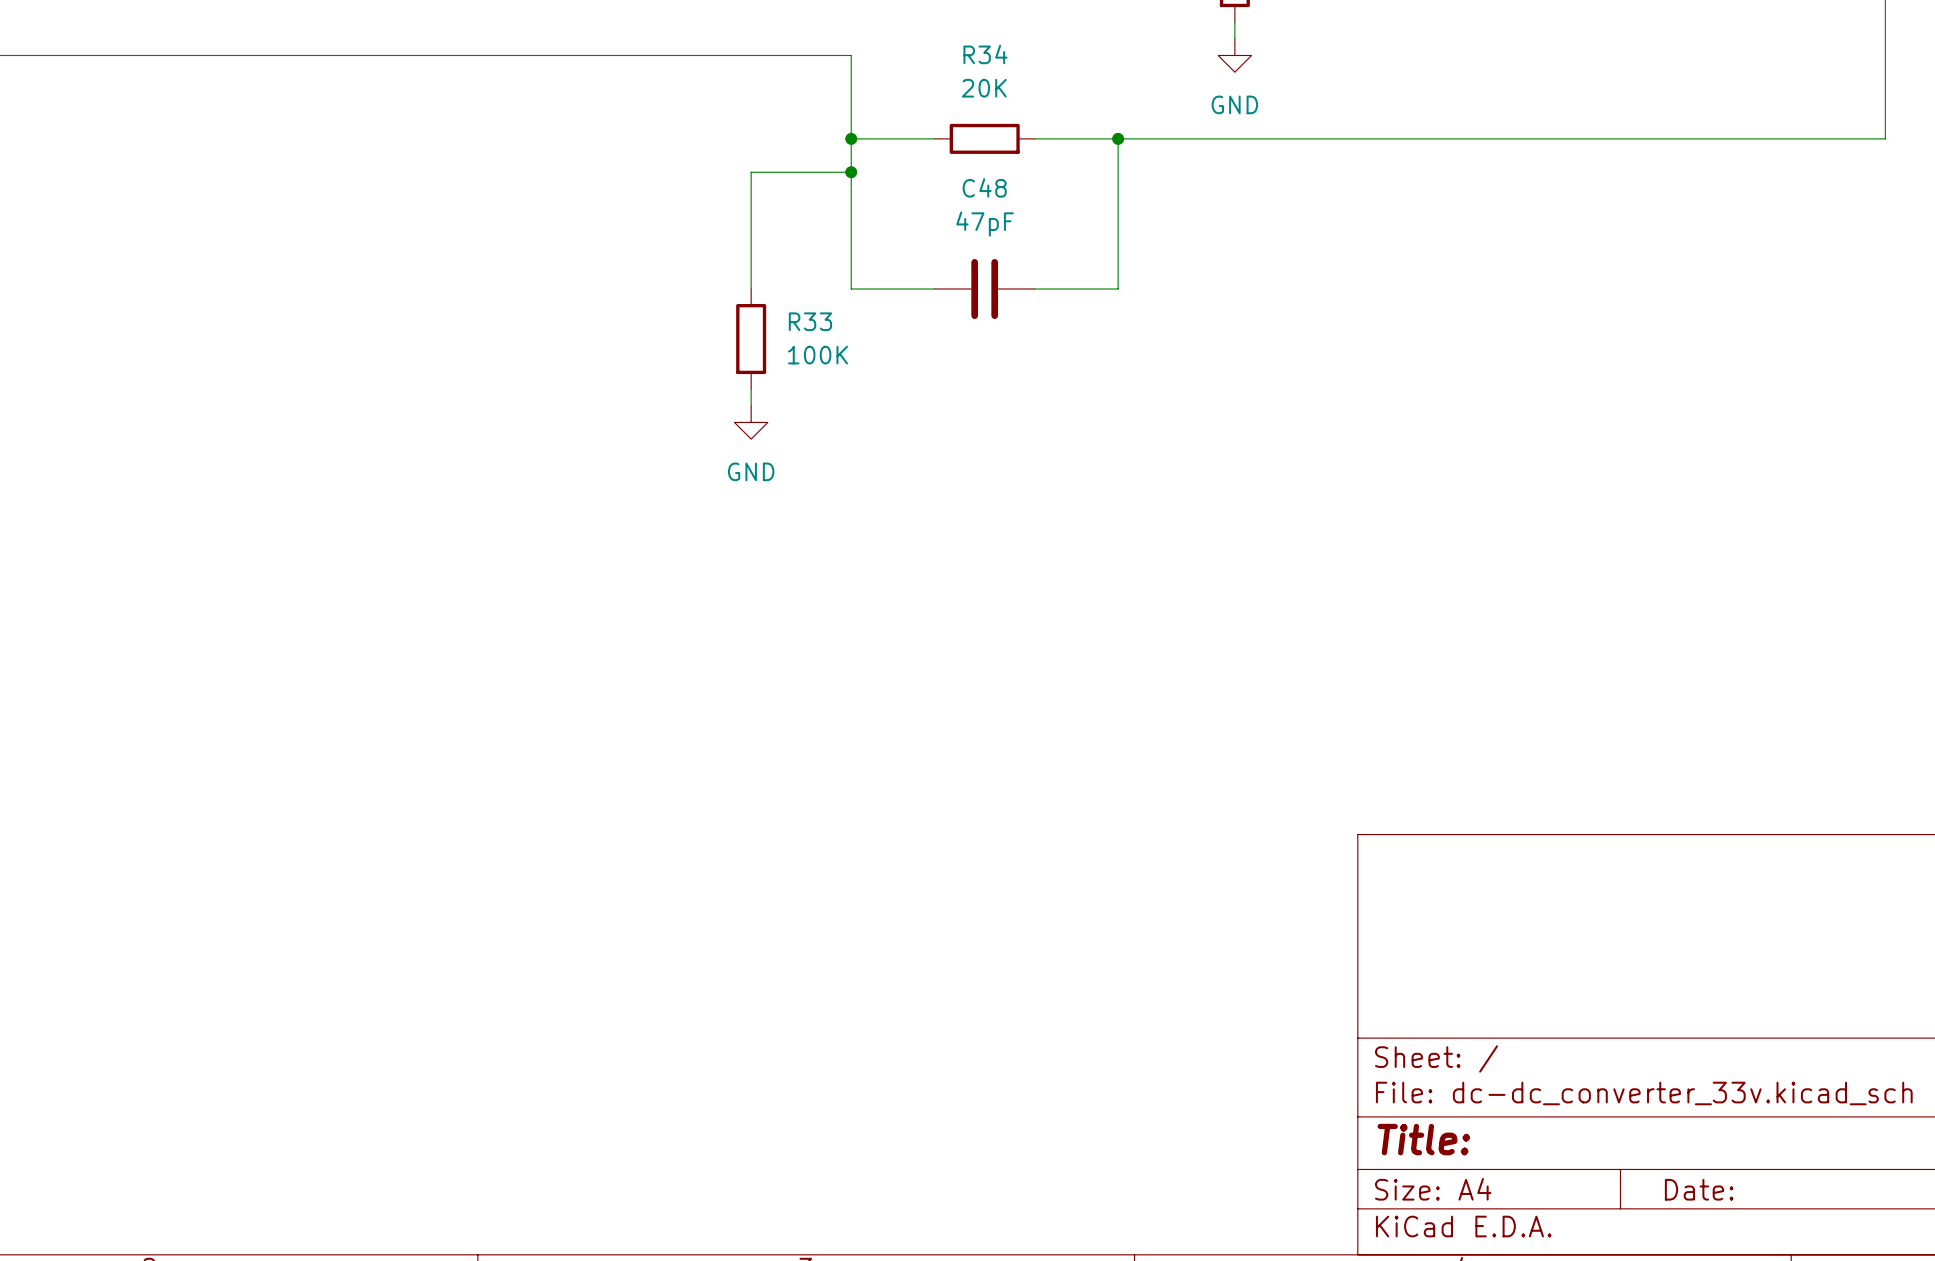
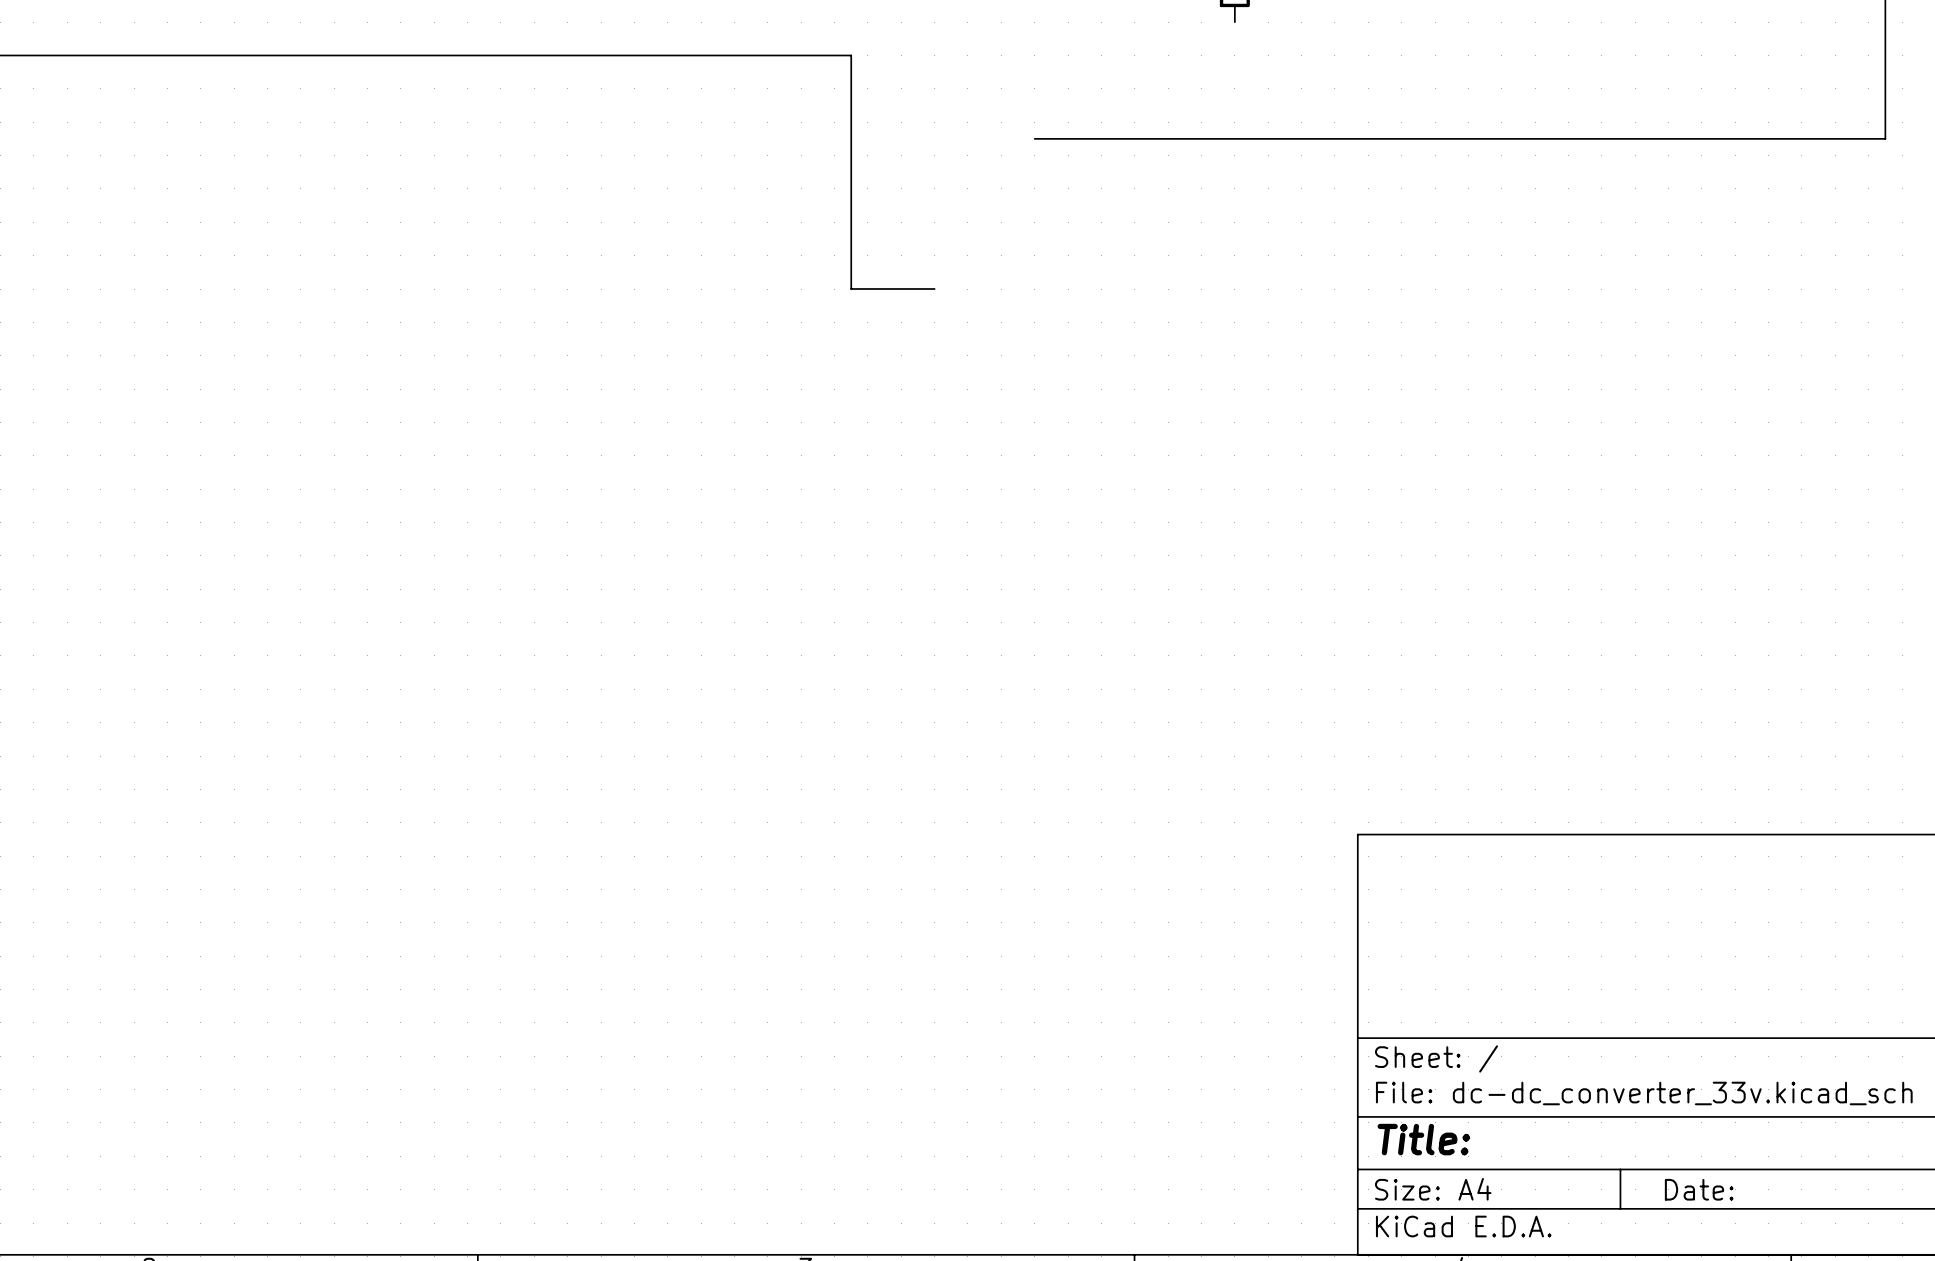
wire: (1234, 22) (1234, 38) -> none
power symbol: GND (1234, 55) -> none
wire: (851, 138) (934, 138) -> none
junction: (851, 138) -> none
R34: 20K (984, 138) -> none
wire: (1118, 138) (1118, 289) (1034, 289) -> none
junction: (1118, 138) -> none
wire: (851, 172) (751, 172) (751, 289) -> none
junction: (851, 172) -> none
C48: 47pF (984, 289) -> none
R33: 100K (751, 339) -> none
wire: (751, 389) (751, 405) -> none
power symbol: GND (751, 422) -> none

